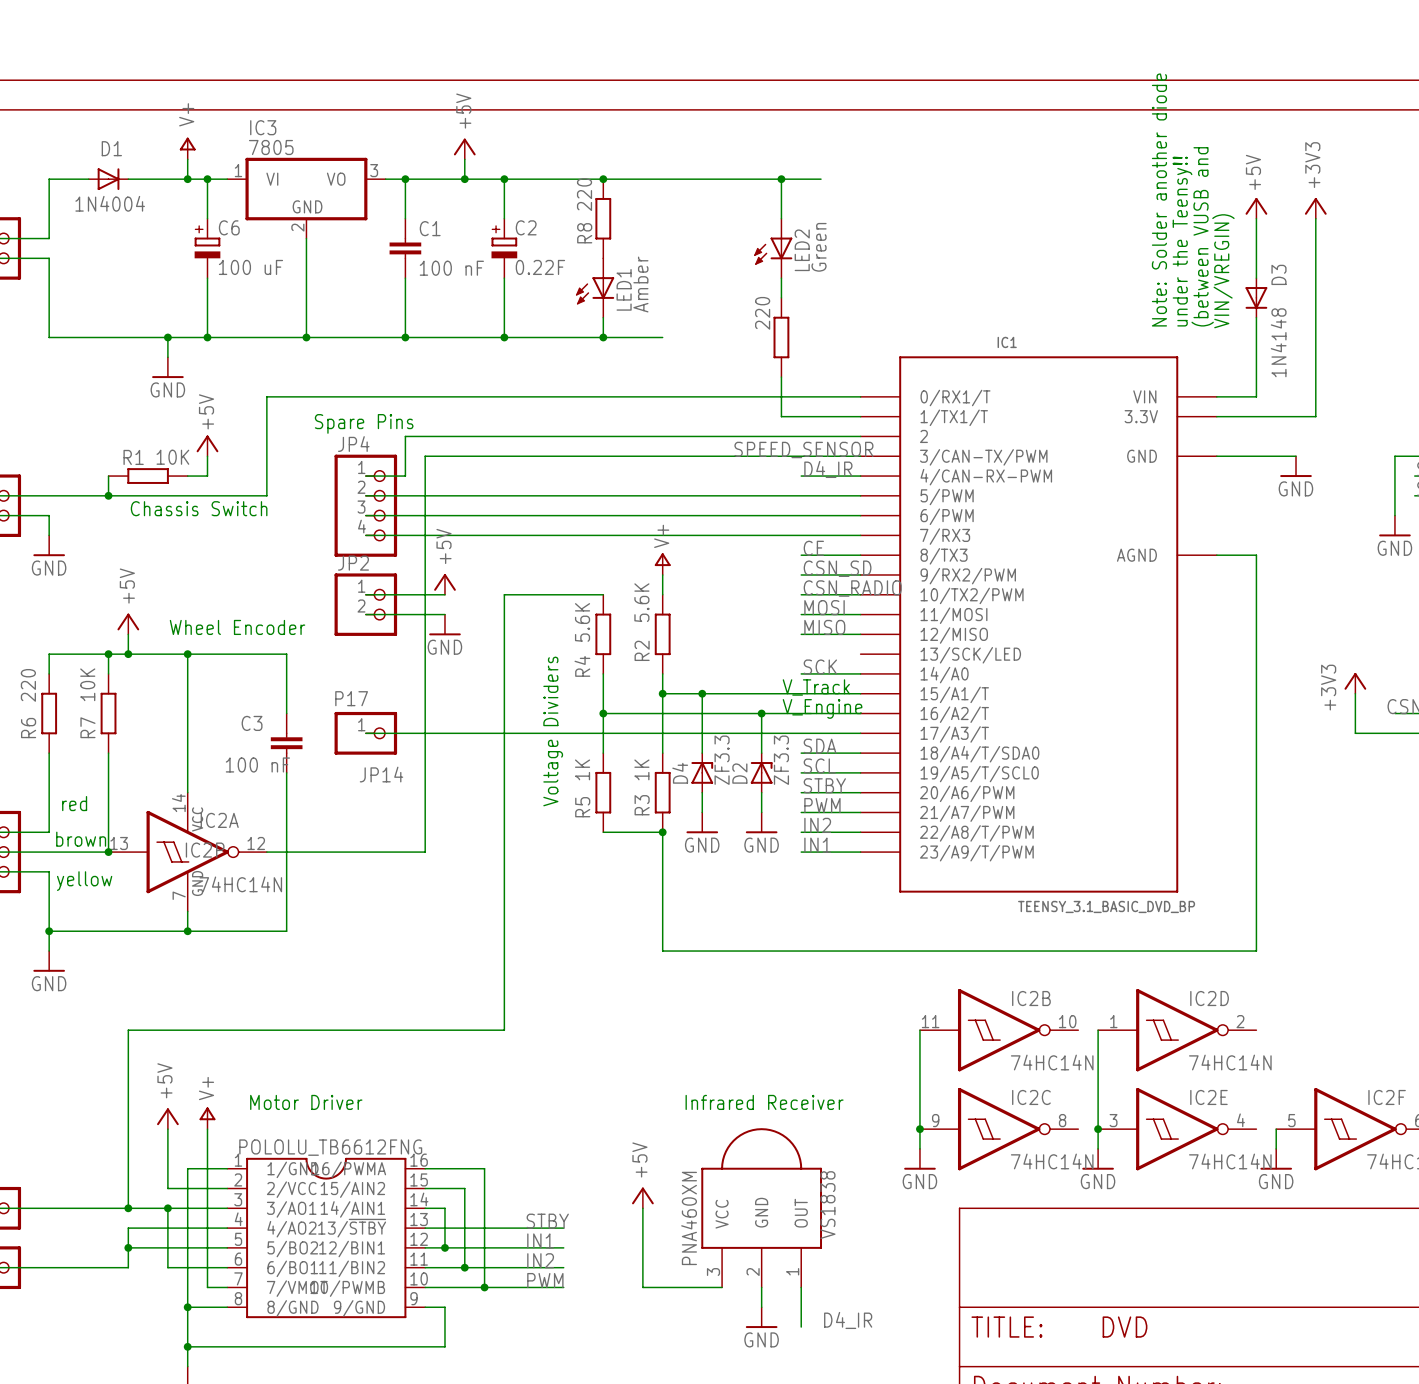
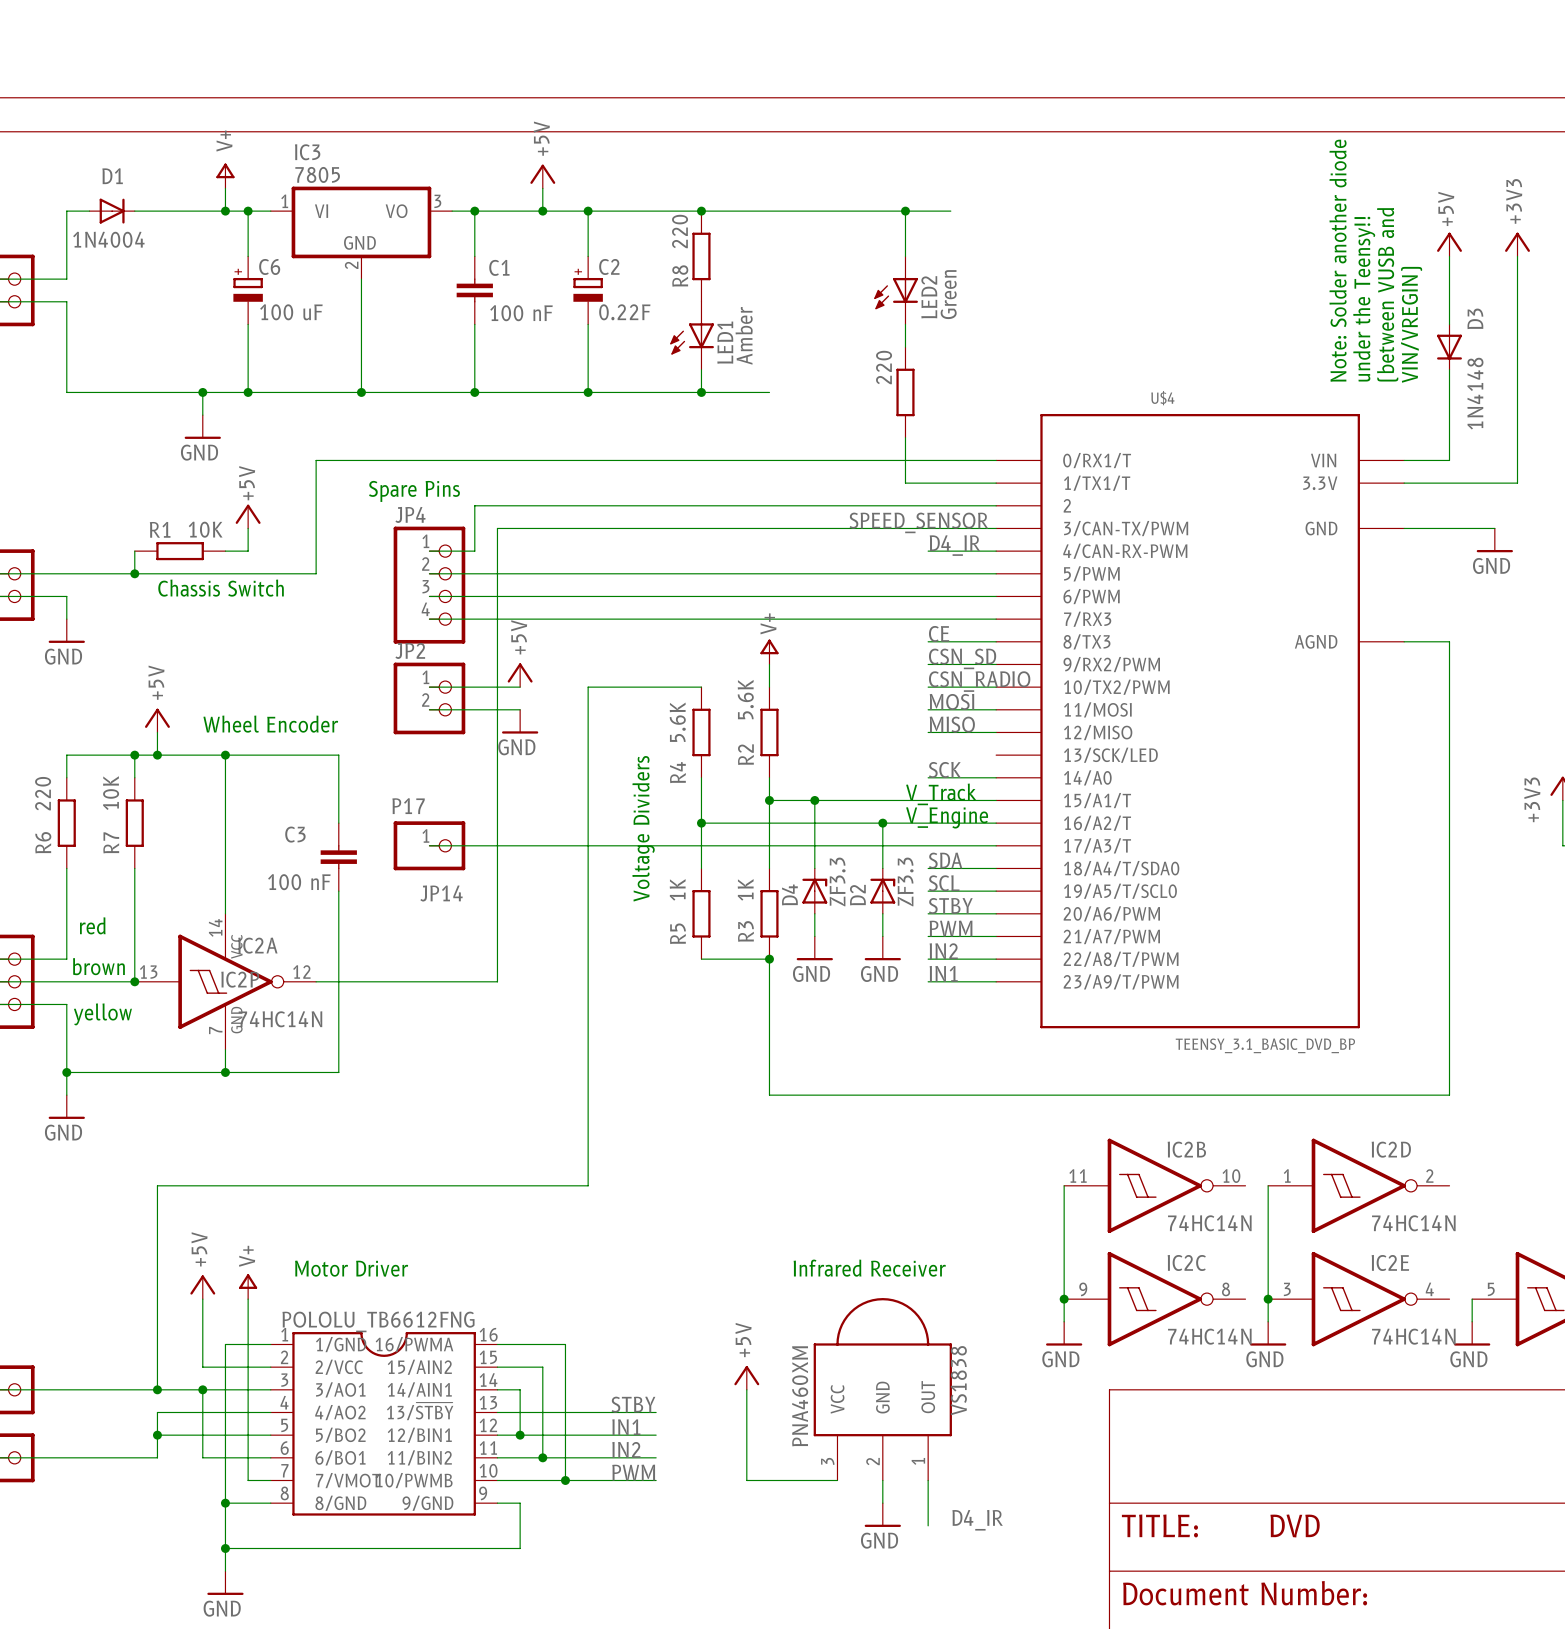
D1 position: (108, 179) -> (112, 211)
IC1 name: IC1 (1007, 342) -> U$4 (1162, 398)

